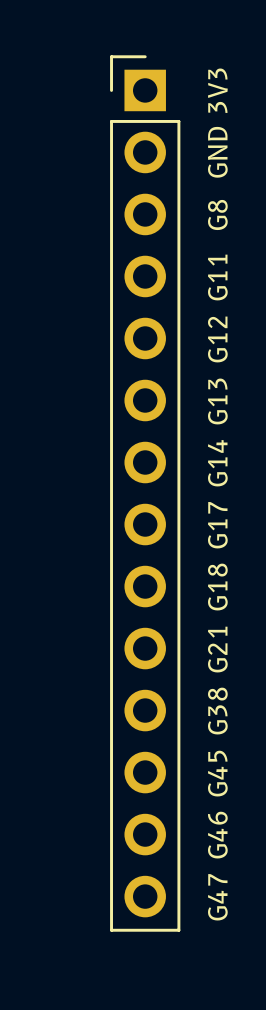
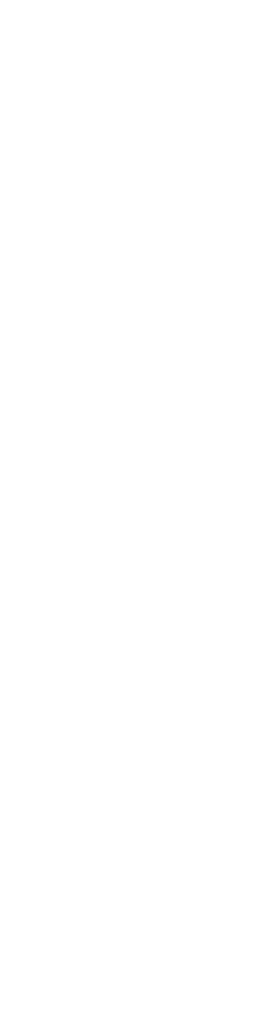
text: 3V3 (217, 90) -> none
text: GND (217, 152) -> none
text: G8 (217, 214) -> none
text: G11 (217, 277) -> none
text: G12 (217, 339) -> none
text: G13 (217, 401) -> none
text: G14 (217, 463) -> none
part: (145, 493) -> none
text: G17 (217, 525) -> none
text: G18 (217, 587) -> none
text: G21 (217, 649) -> none
text: G38 (217, 711) -> none
text: G45 (217, 773) -> none
text: G46 (217, 835) -> none
text: G47 (217, 897) -> none

